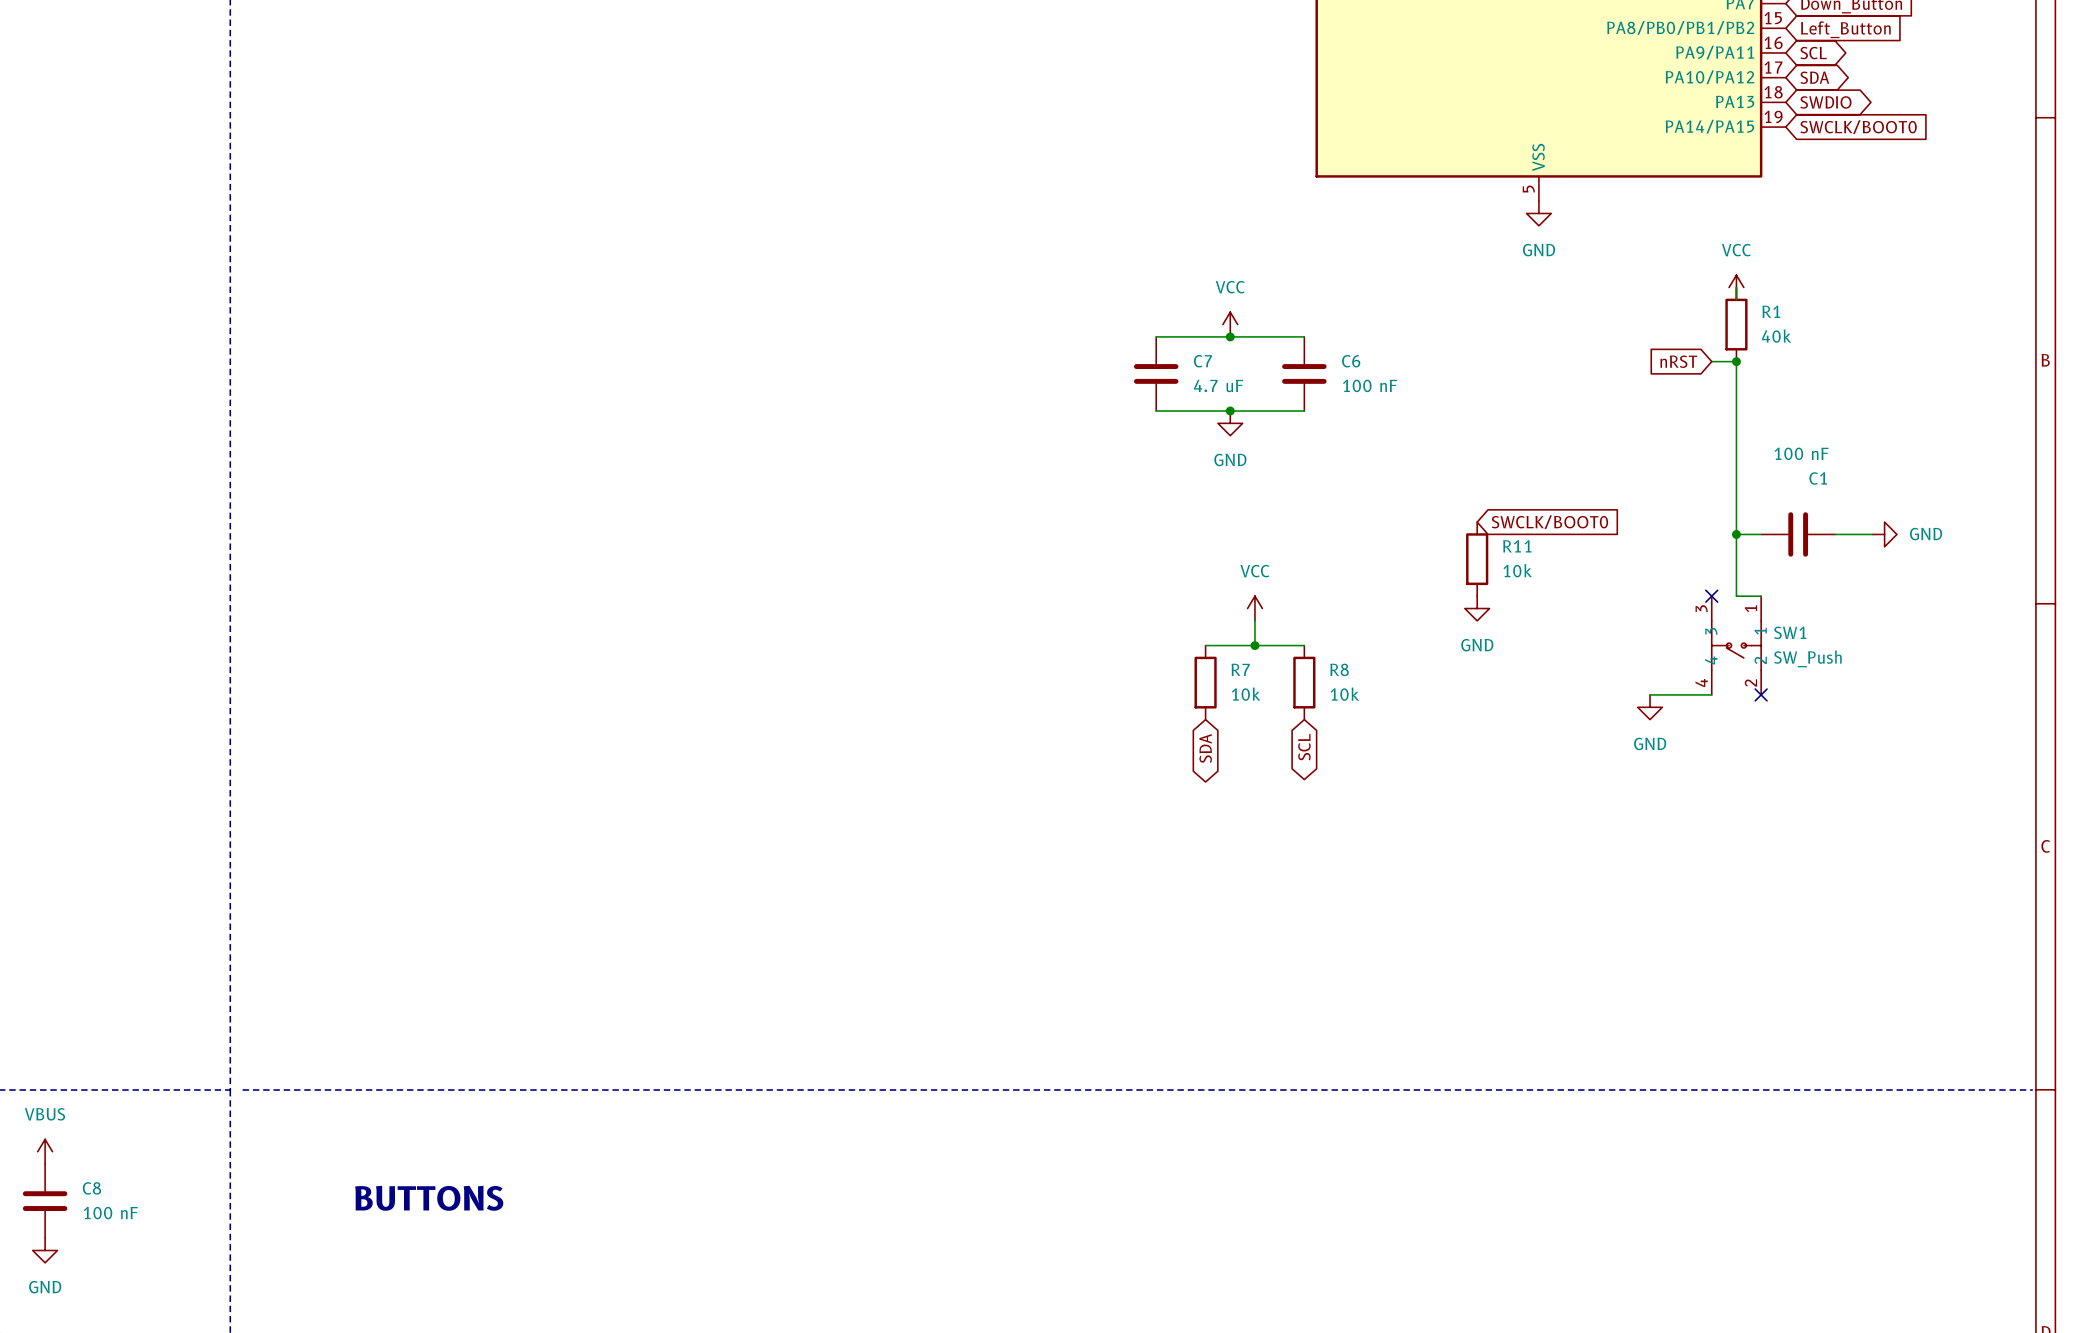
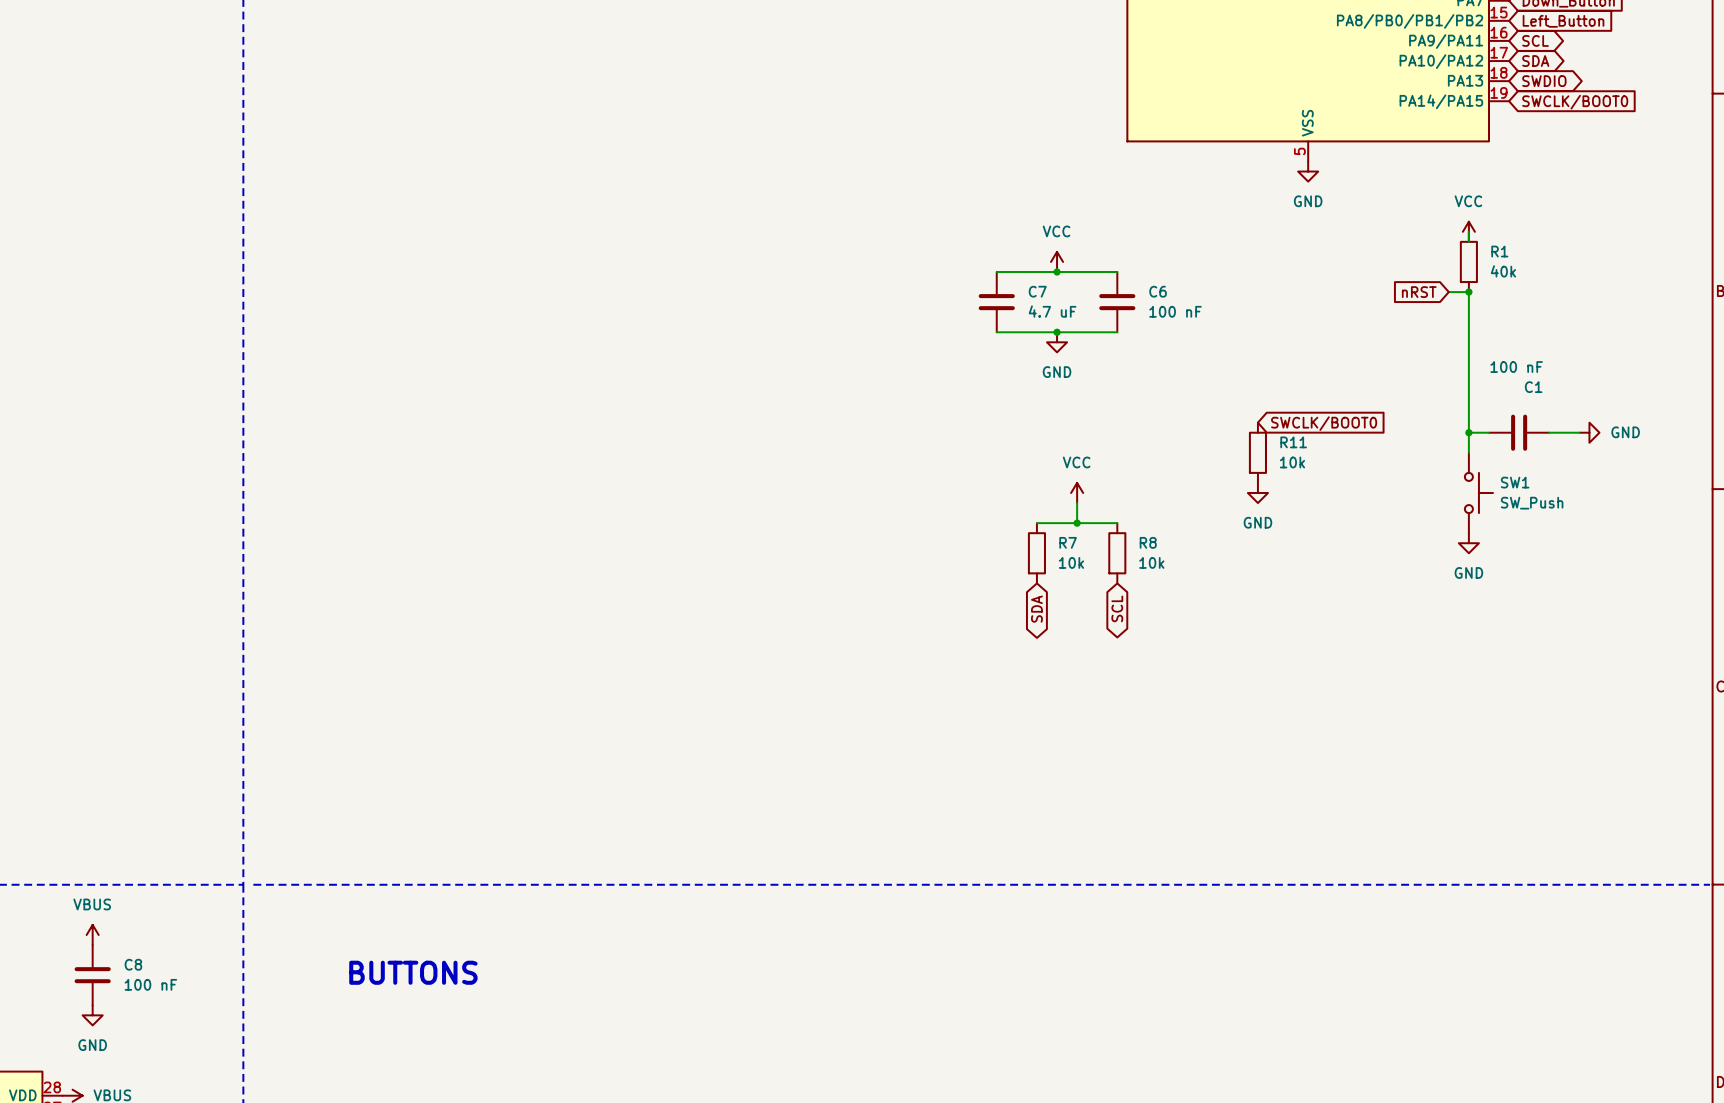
wire: (1736, 559) (1736, 596) (1761, 596) -> none
no-connect mark: (1711, 596) -> none
SW1 symbol: [1711, 596, 1762, 695] -> [1464, 452, 1494, 534]
wire: (1650, 694) (1711, 694) -> none
no-connect mark: (1761, 694) -> none
power symbol position: GND (1650, 707) -> GND (1468, 543)

